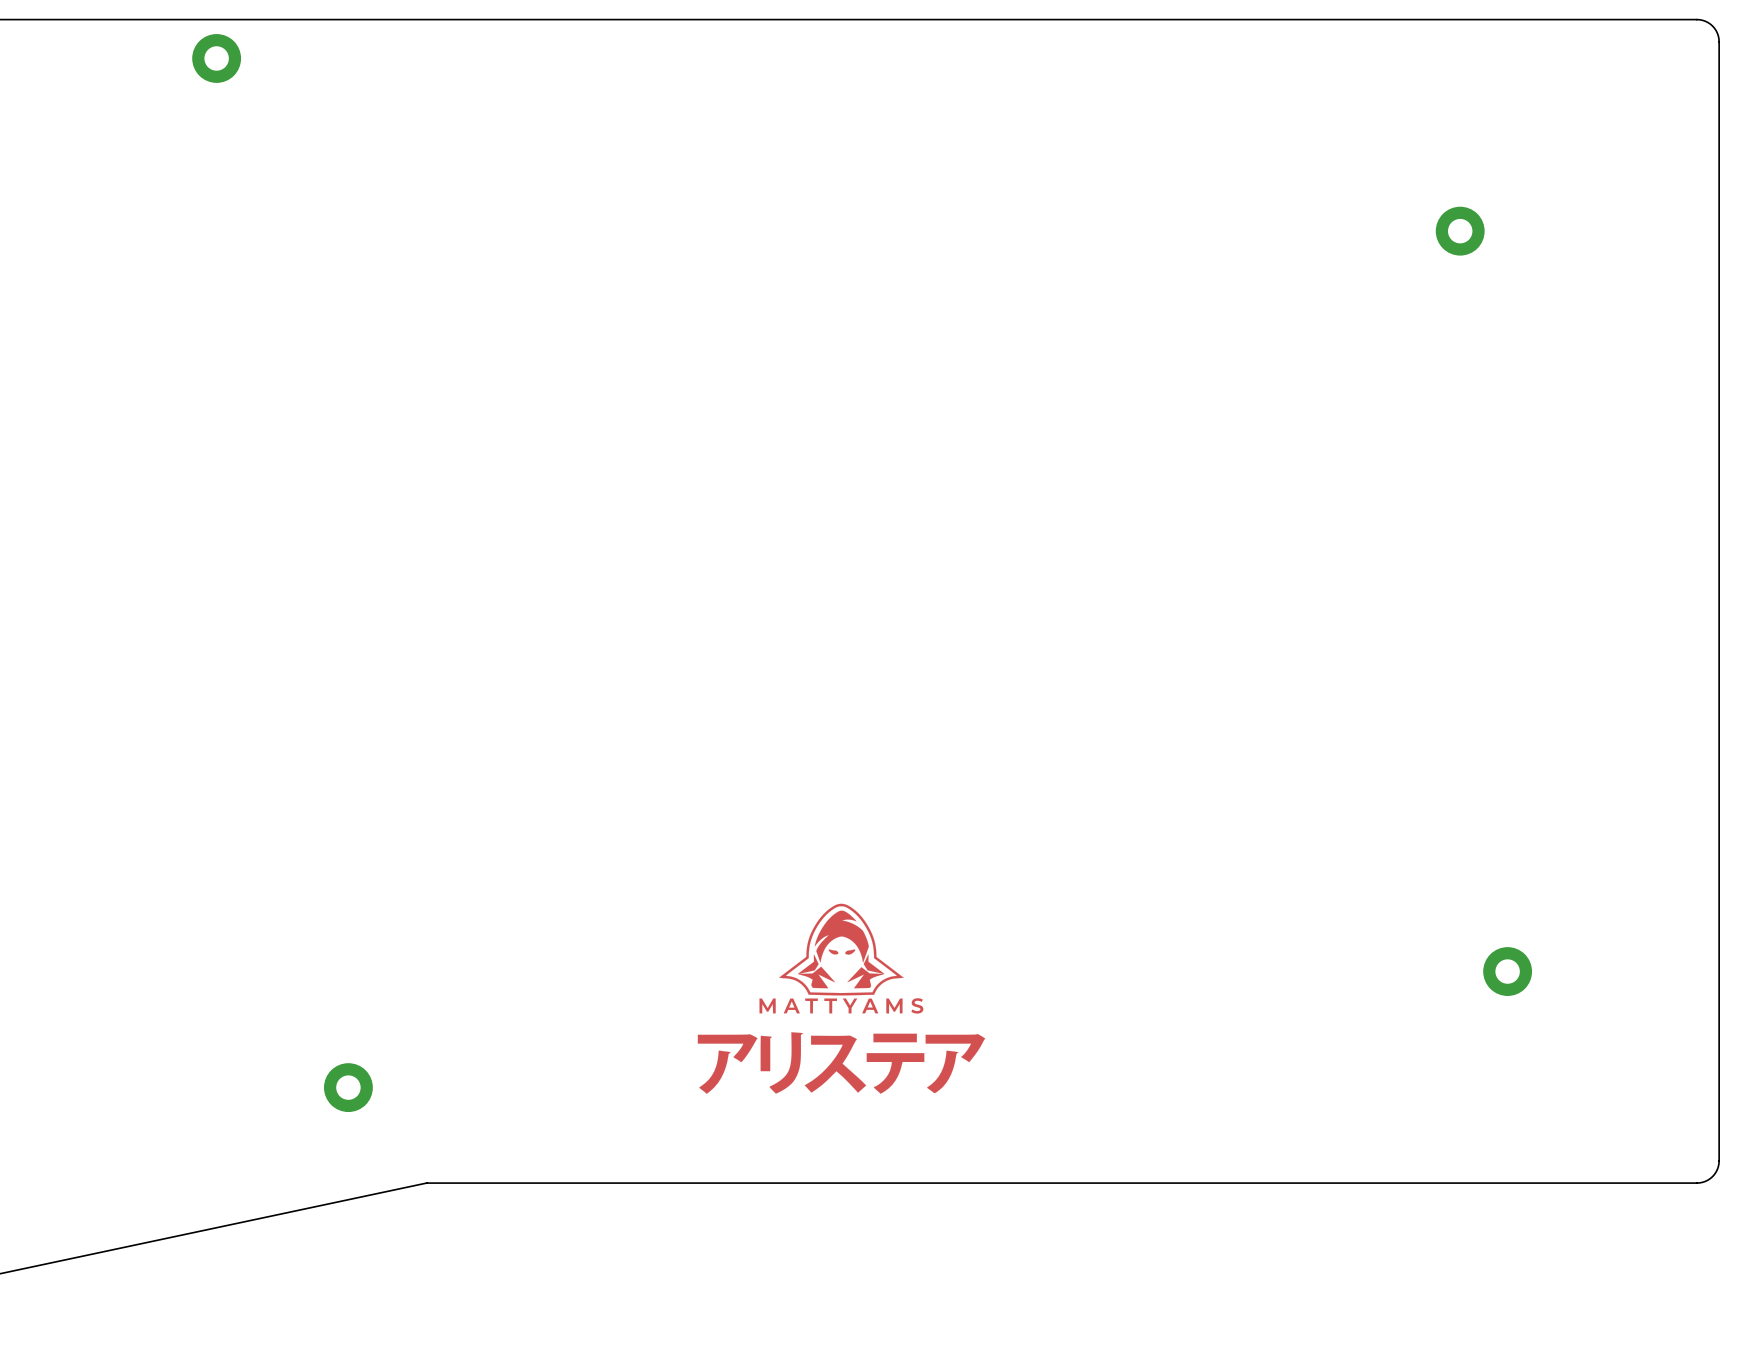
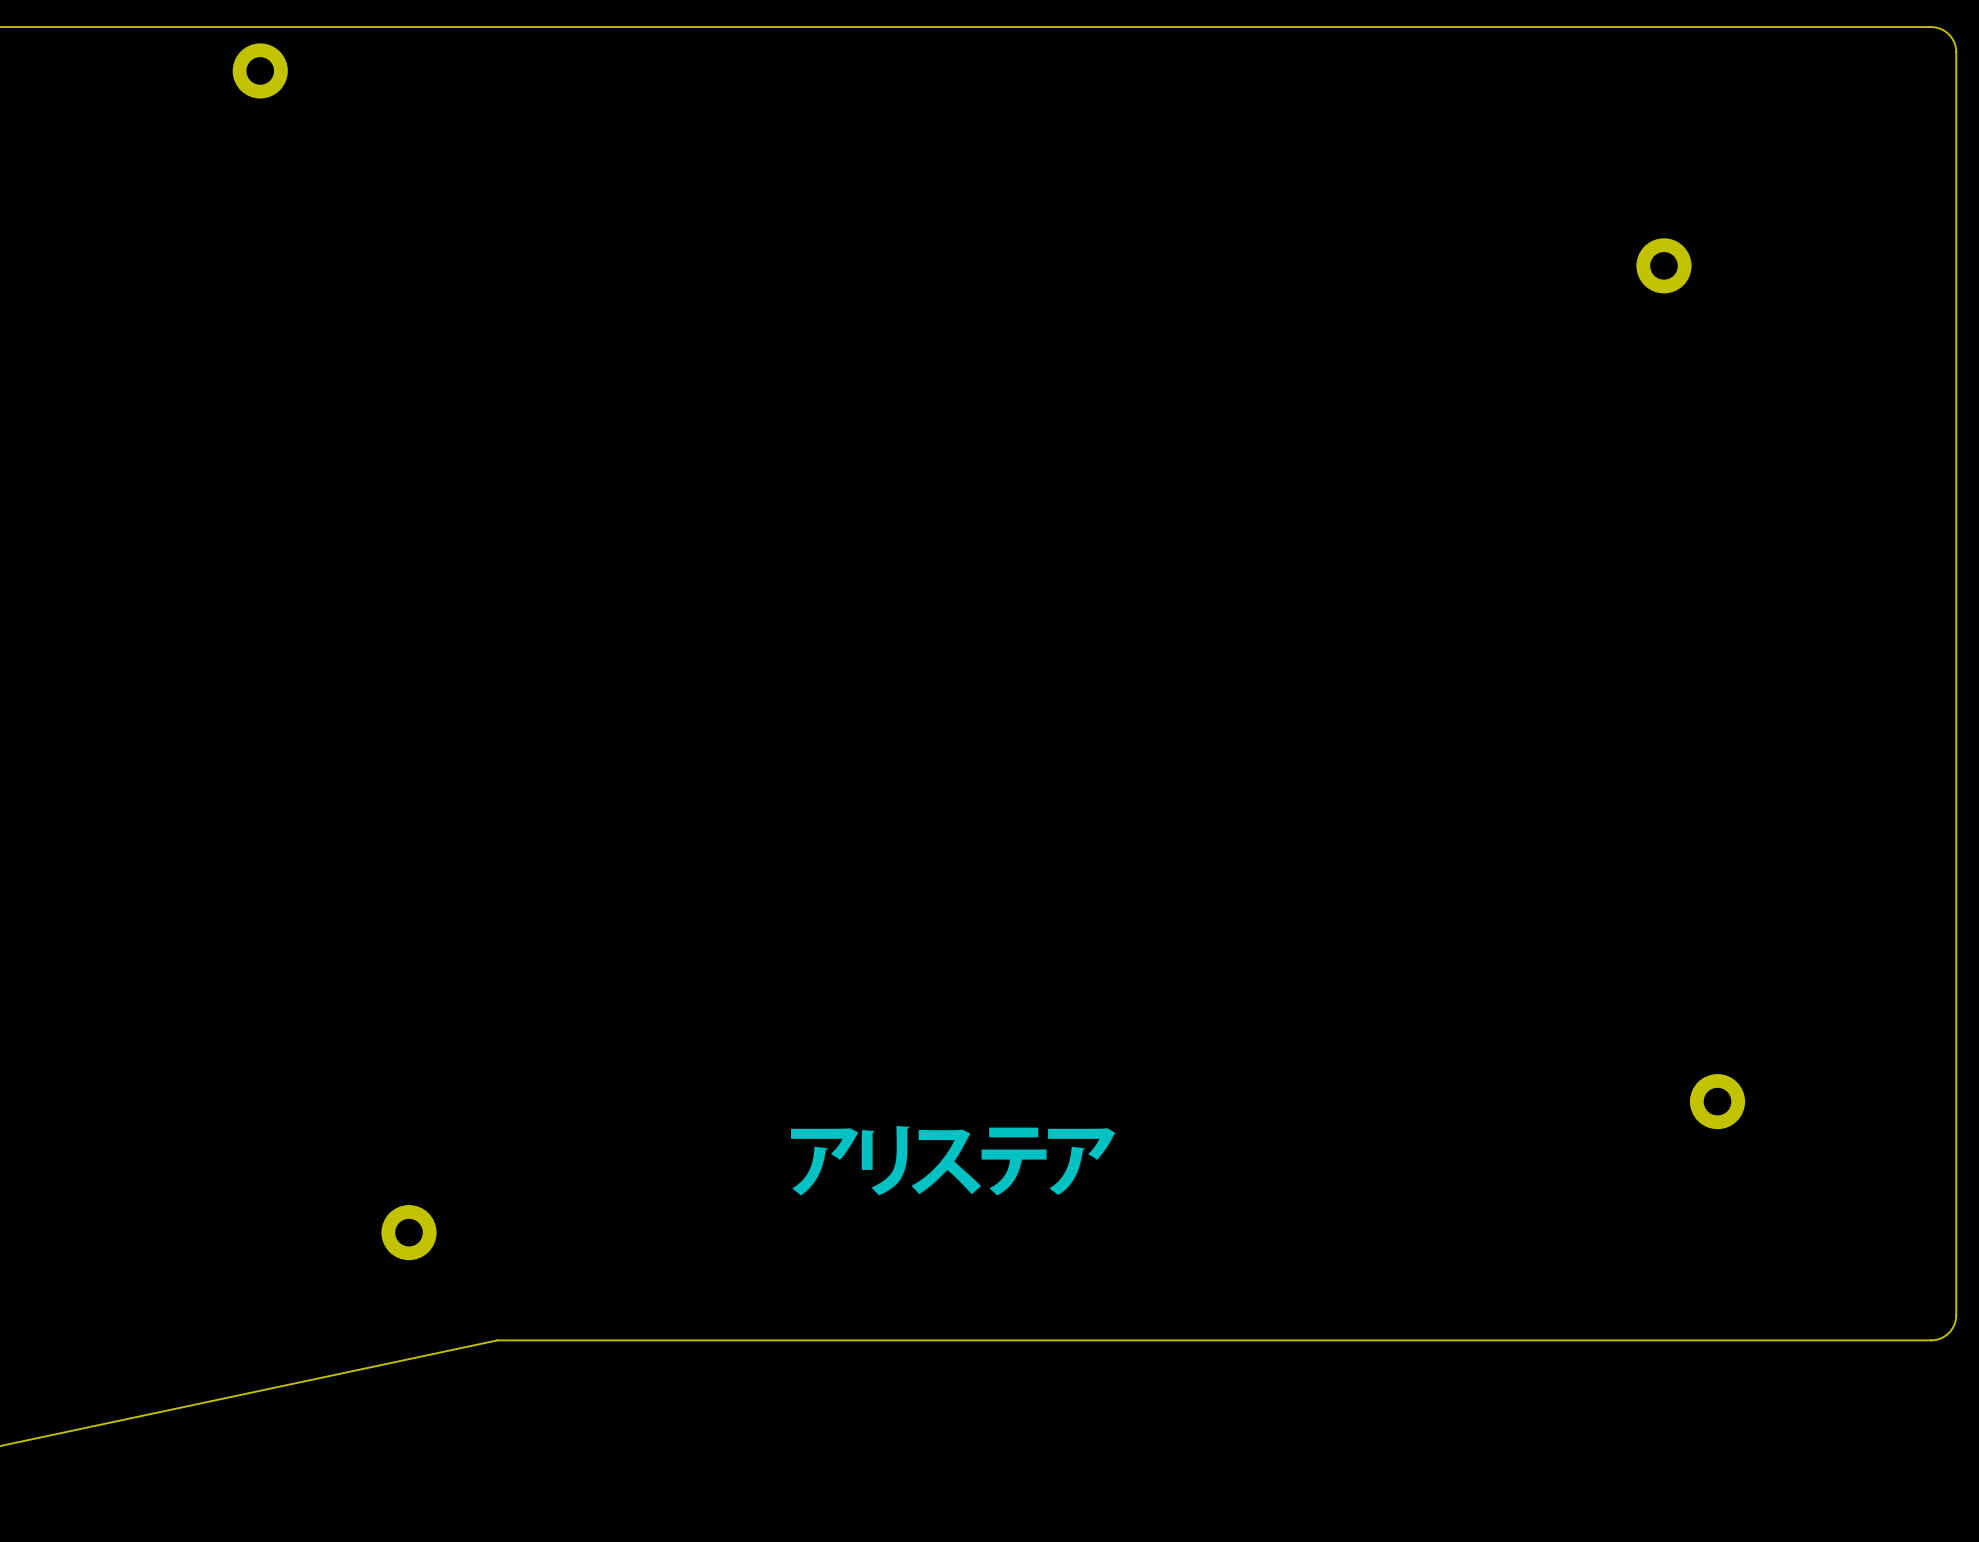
drawing: [759, 903, 924, 1014] -> none
drawing: none -> [790, 1125, 1116, 1196]
drawing: [697, 1032, 986, 1094] -> none

